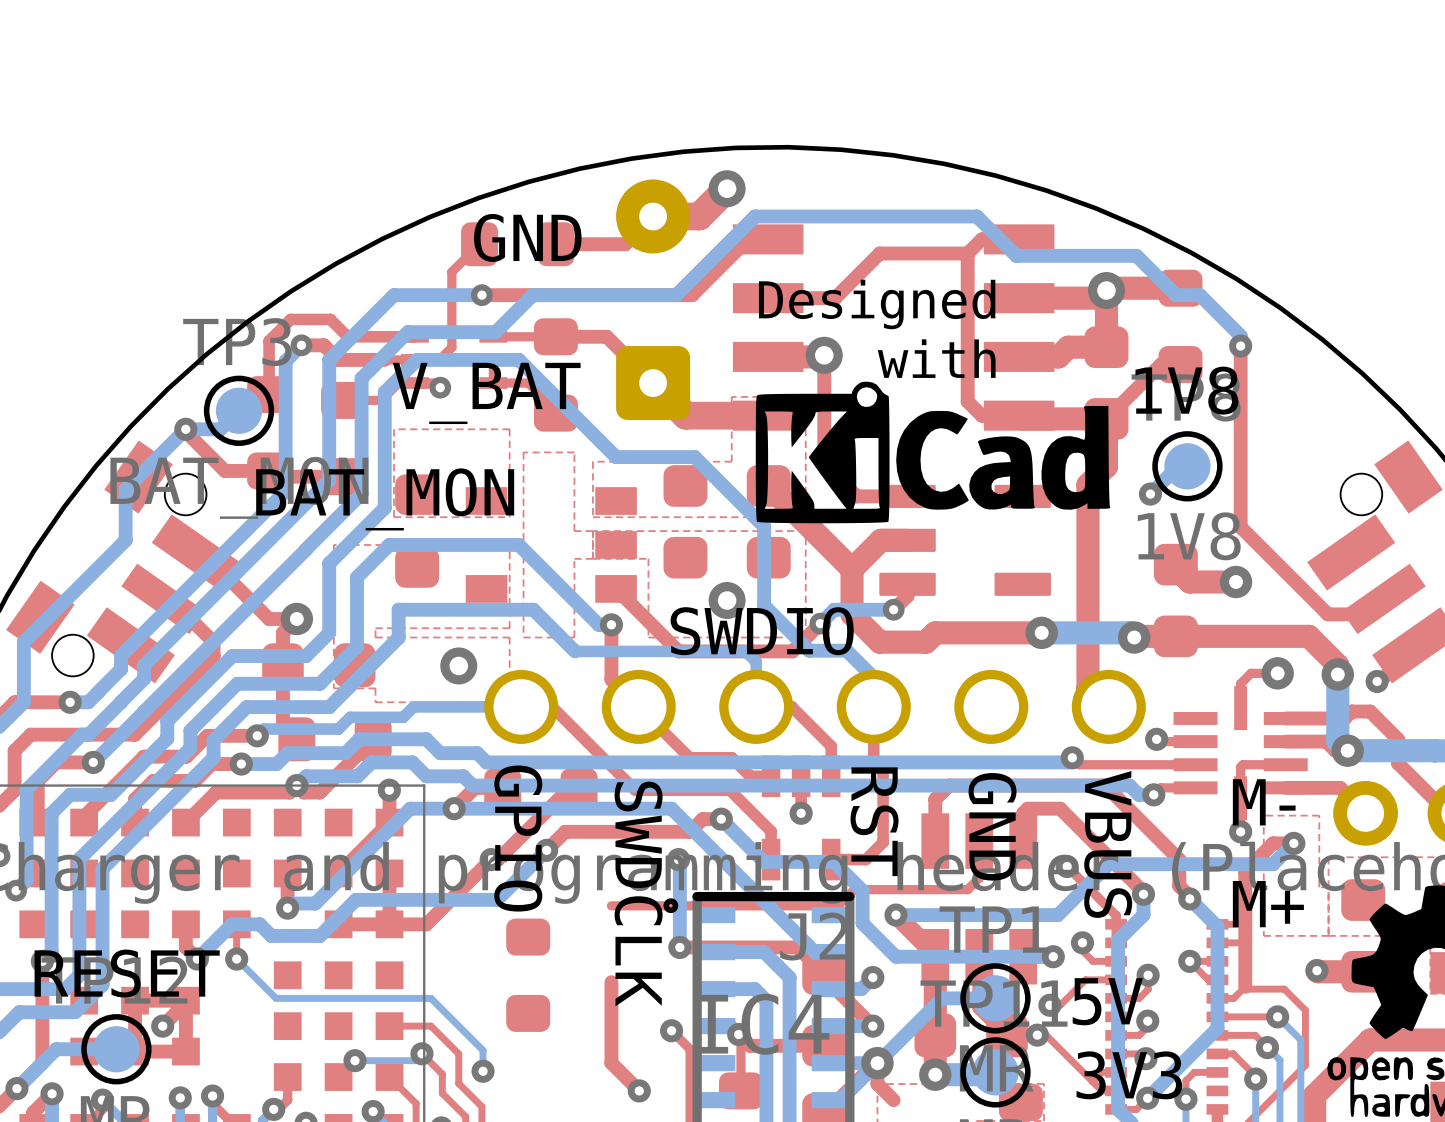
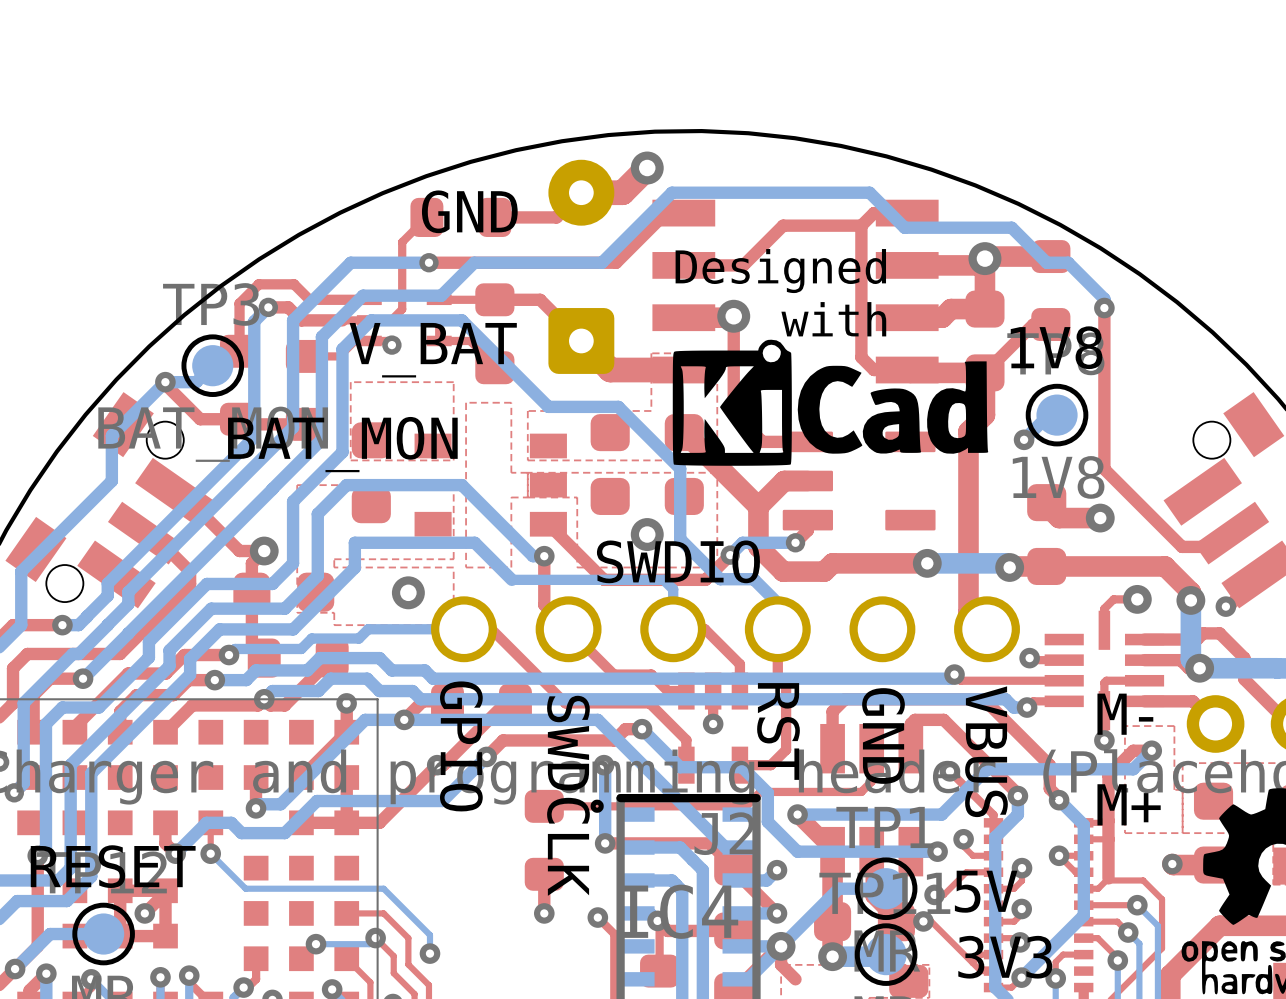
part position: (528, 975) -> (544, 840)
top track: (611, 1026) (611, 1063) (639, 1090) -> none
via position: (639, 1090) -> (544, 913)

